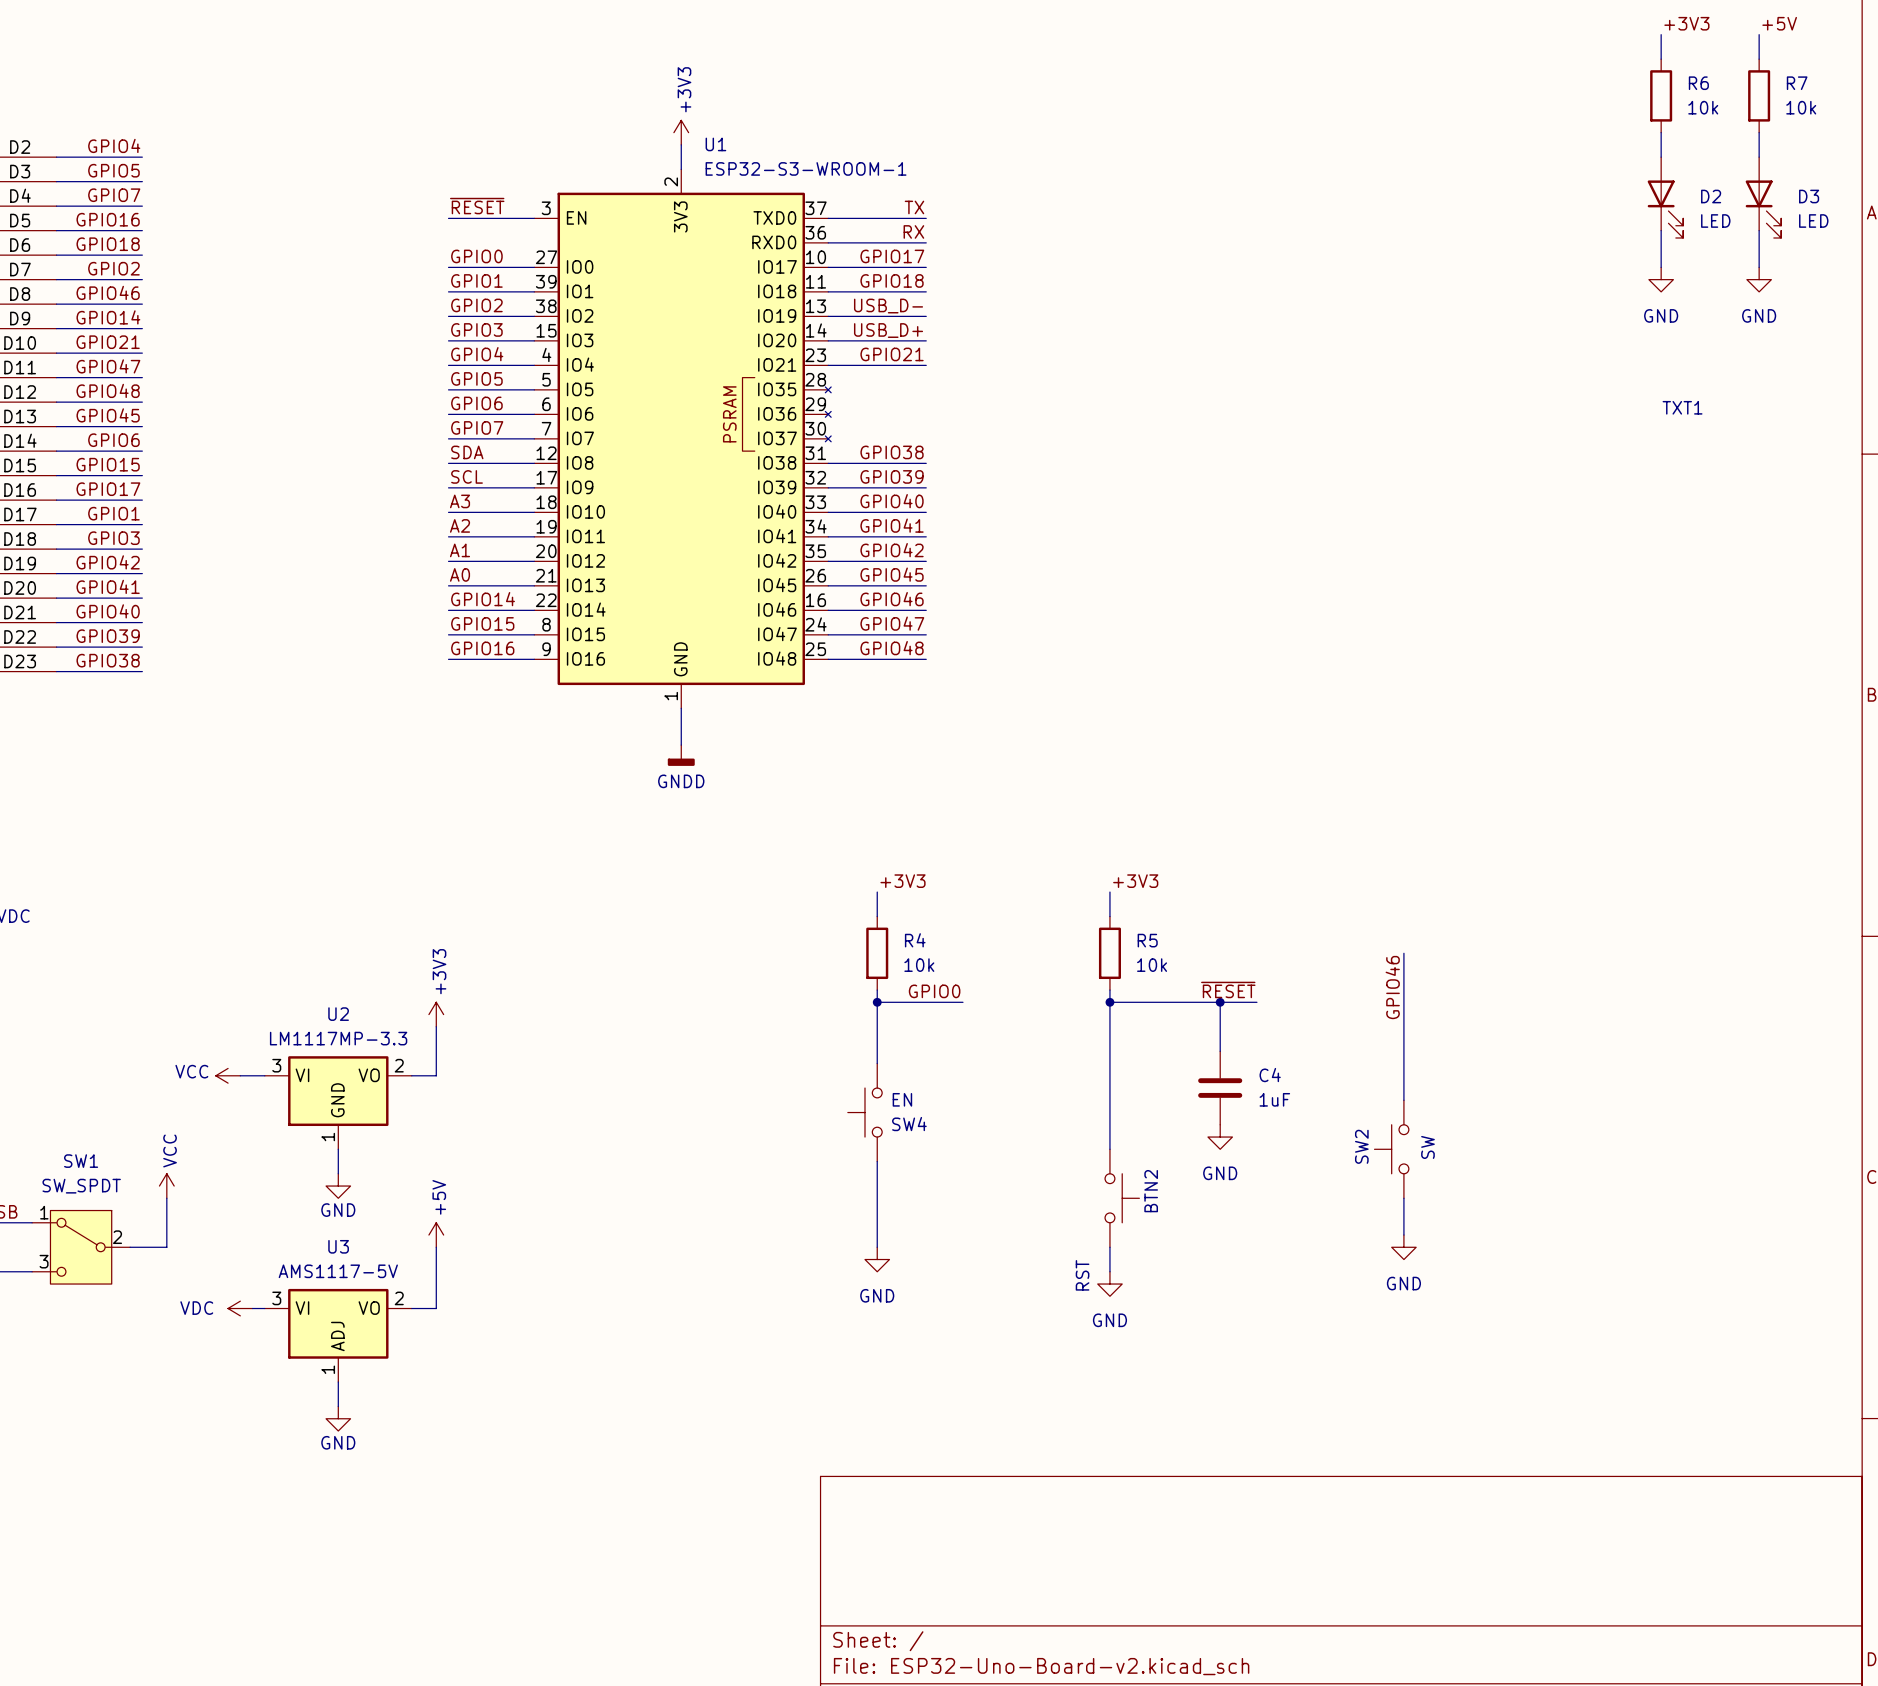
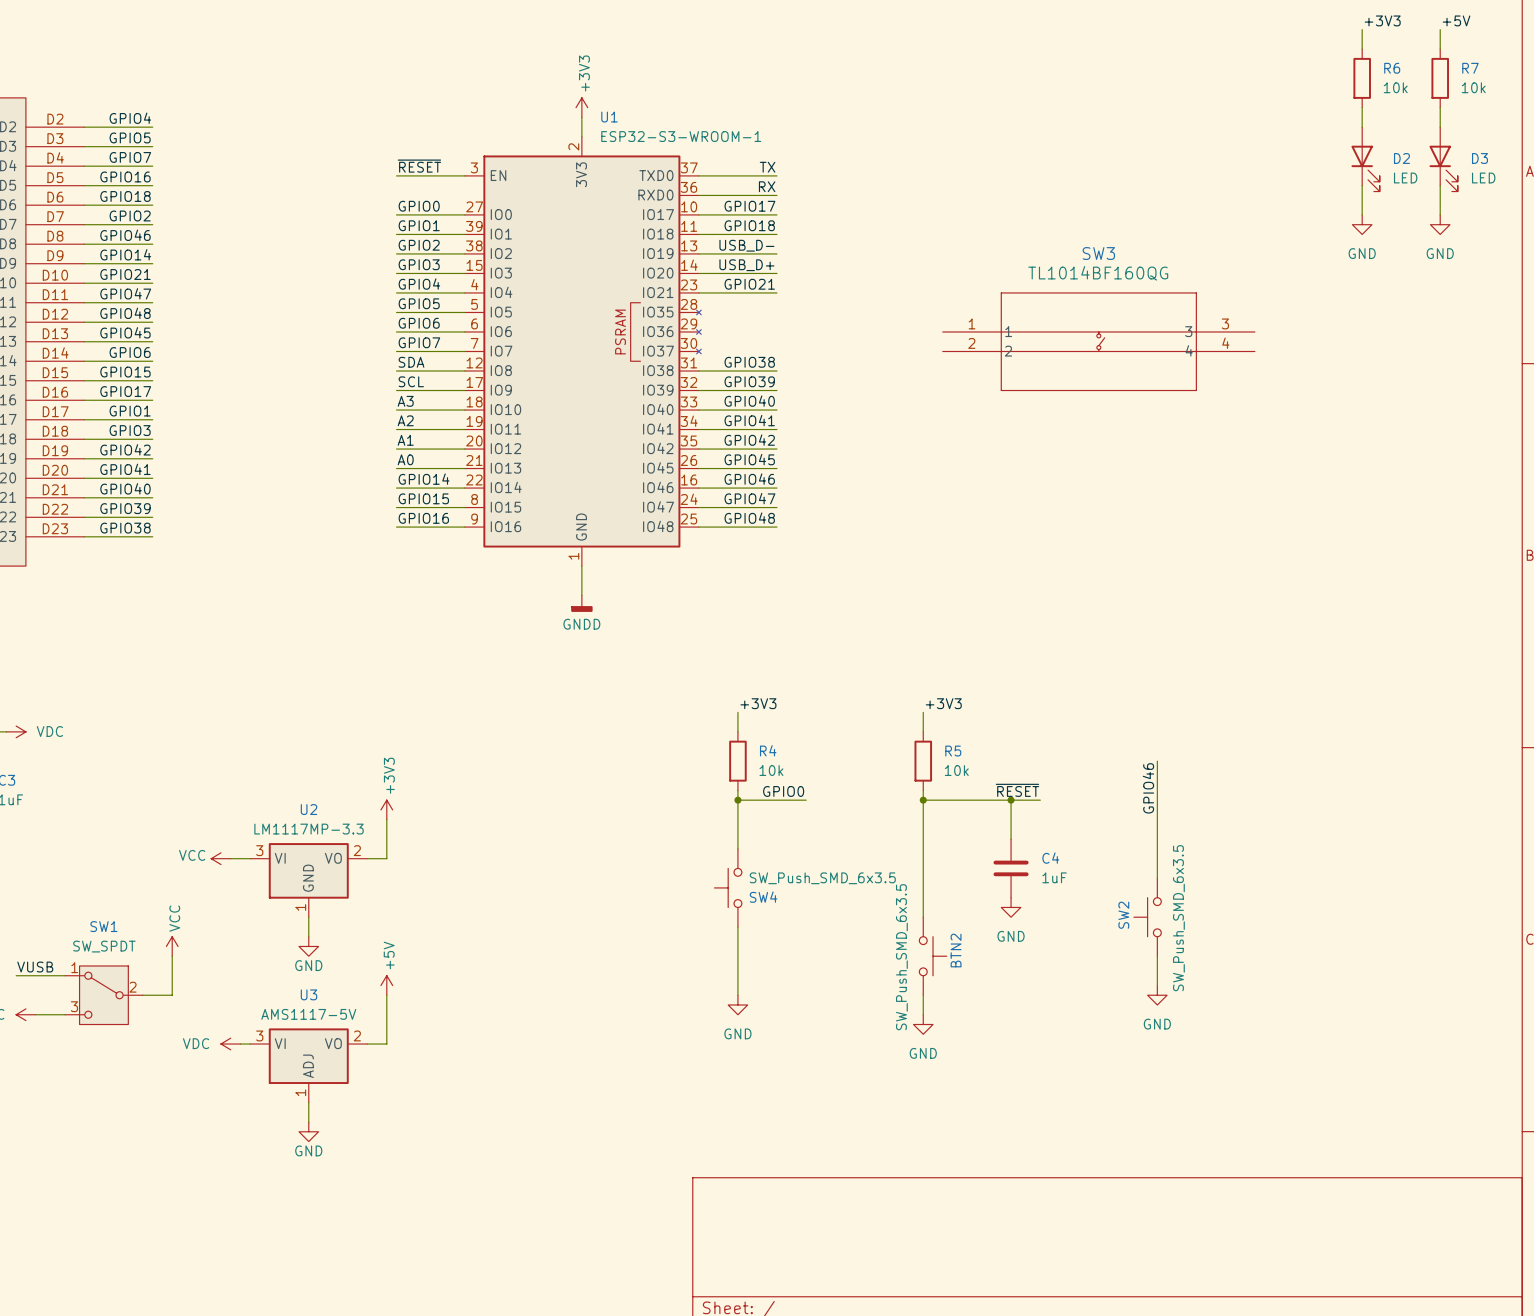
TXT1: (1682, 407) -> none
SW3: none -> TL1014BF160QG (1098, 341)
SW4 value: EN (902, 1099) -> SW_Push_SMD_6x3.5 (822, 878)
SW2 value: SW (1427, 1147) -> SW_Push_SMD_6x3.5 (1178, 918)
BTN2 value: RST (1082, 1275) -> SW_Push_SMD_6x3.5 (901, 957)

